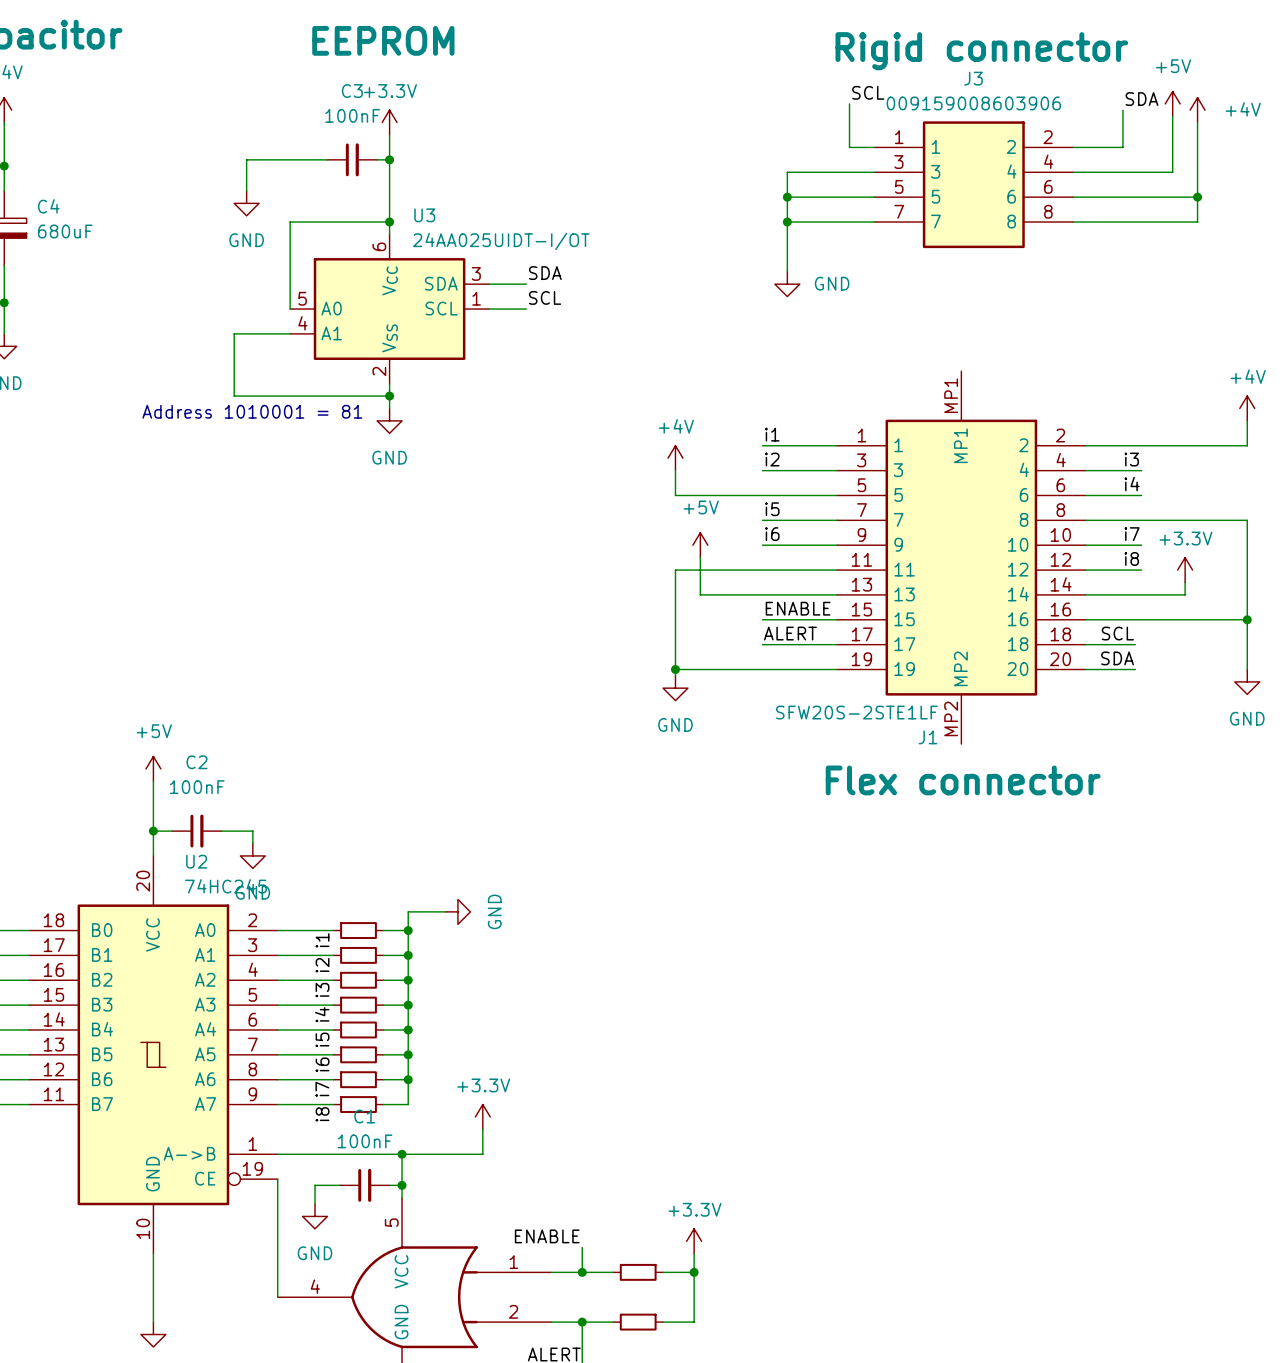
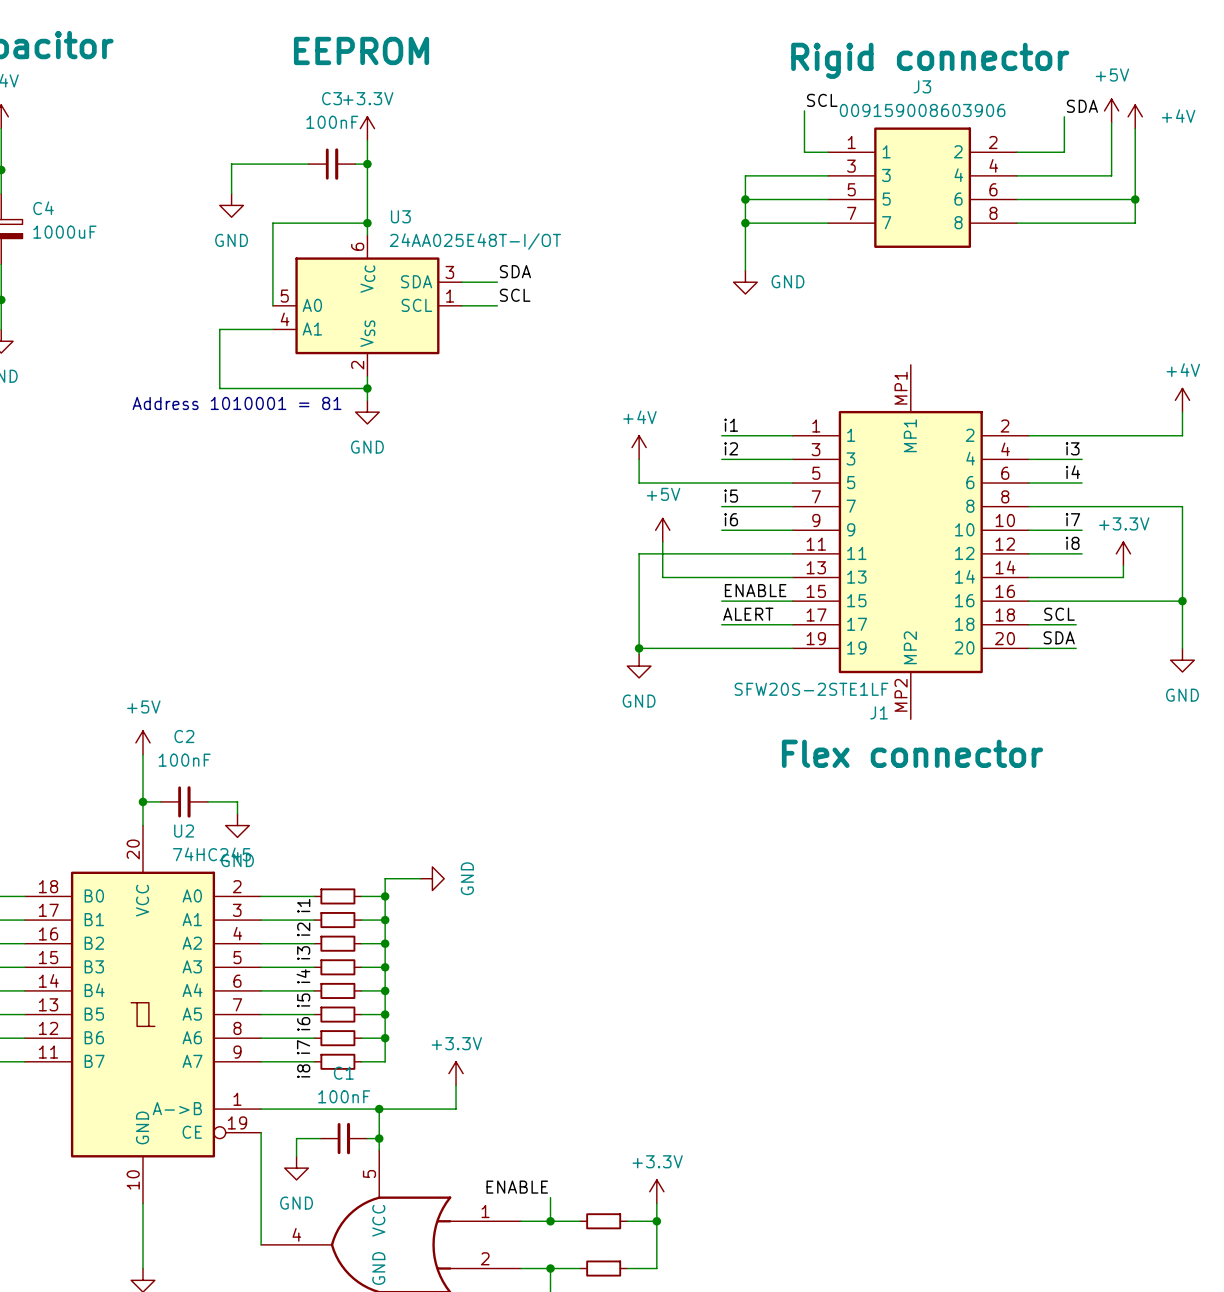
C4 value: 680uF (65, 231) -> 1000uF (64, 232)
U3 value: 24AA025UIDT-I/OT (501, 241) -> 24AA025E48T-I/OT (475, 241)

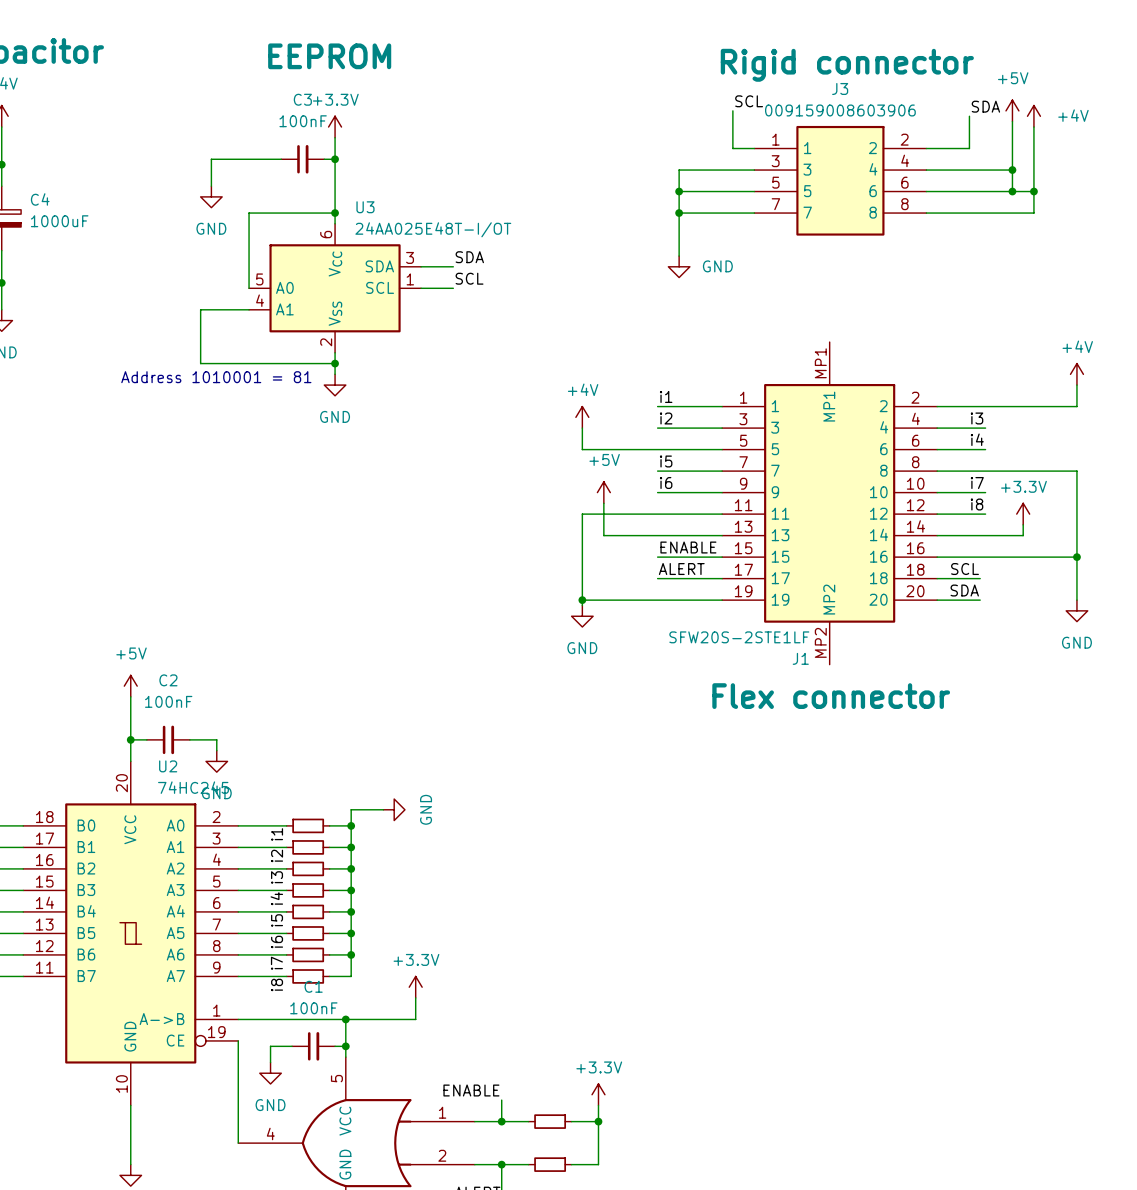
wire: none -> (1012, 170) (1012, 191)
junction: none -> (1012, 170)
junction: none -> (1012, 191)

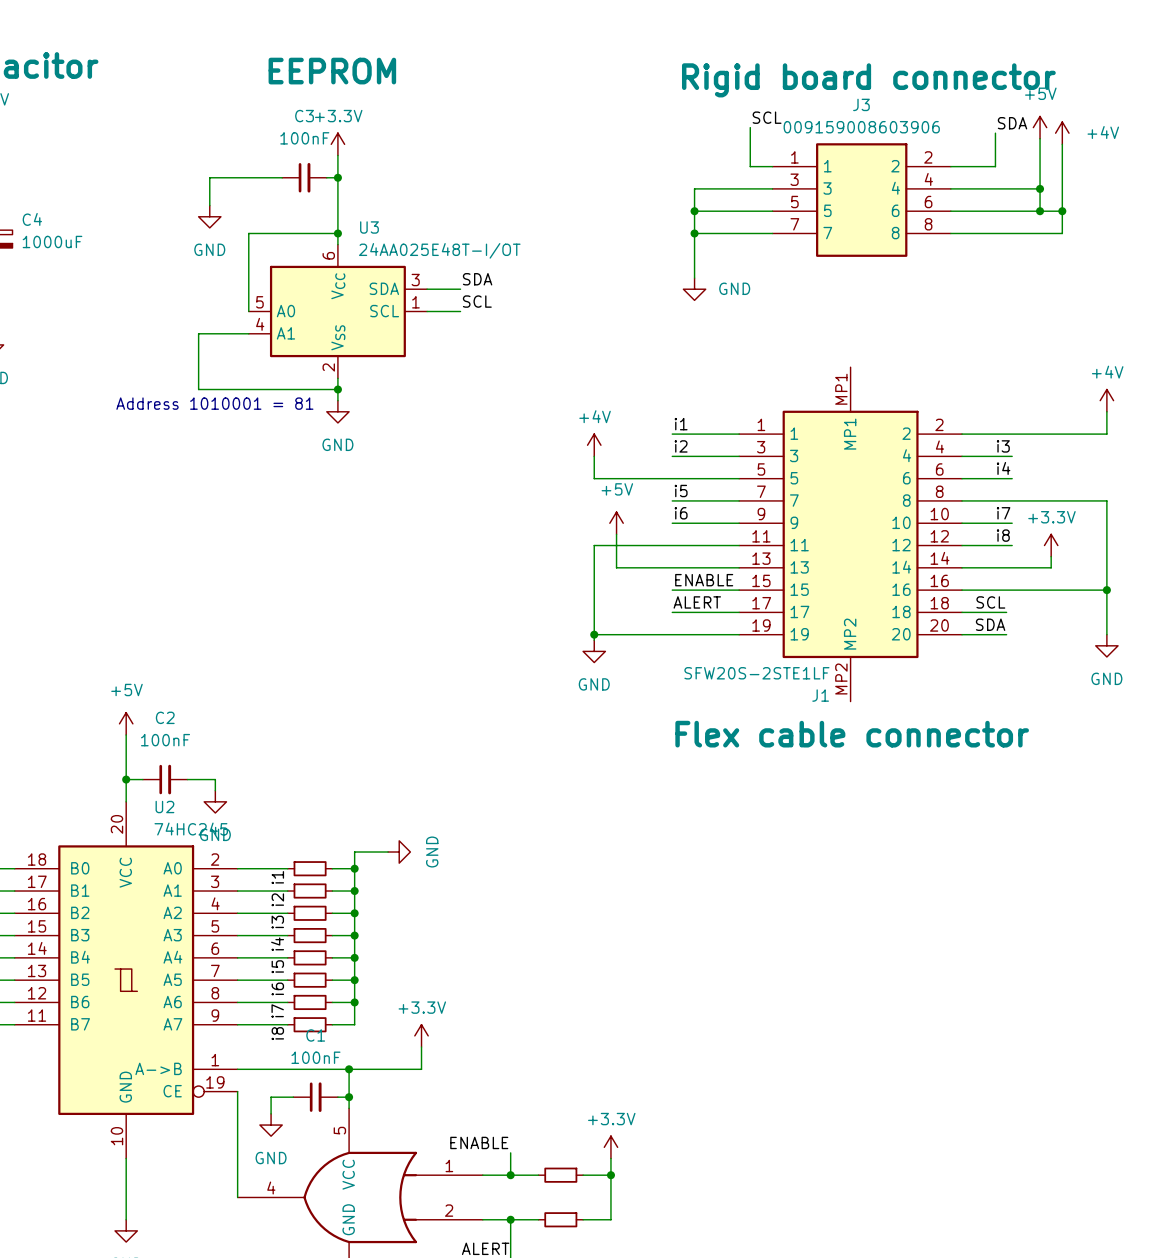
J3 text: Rigid connector (847, 65) -> Rigid board connector (868, 80)
J1 text: Flex connector (831, 696) -> Flex cable connector (852, 734)

